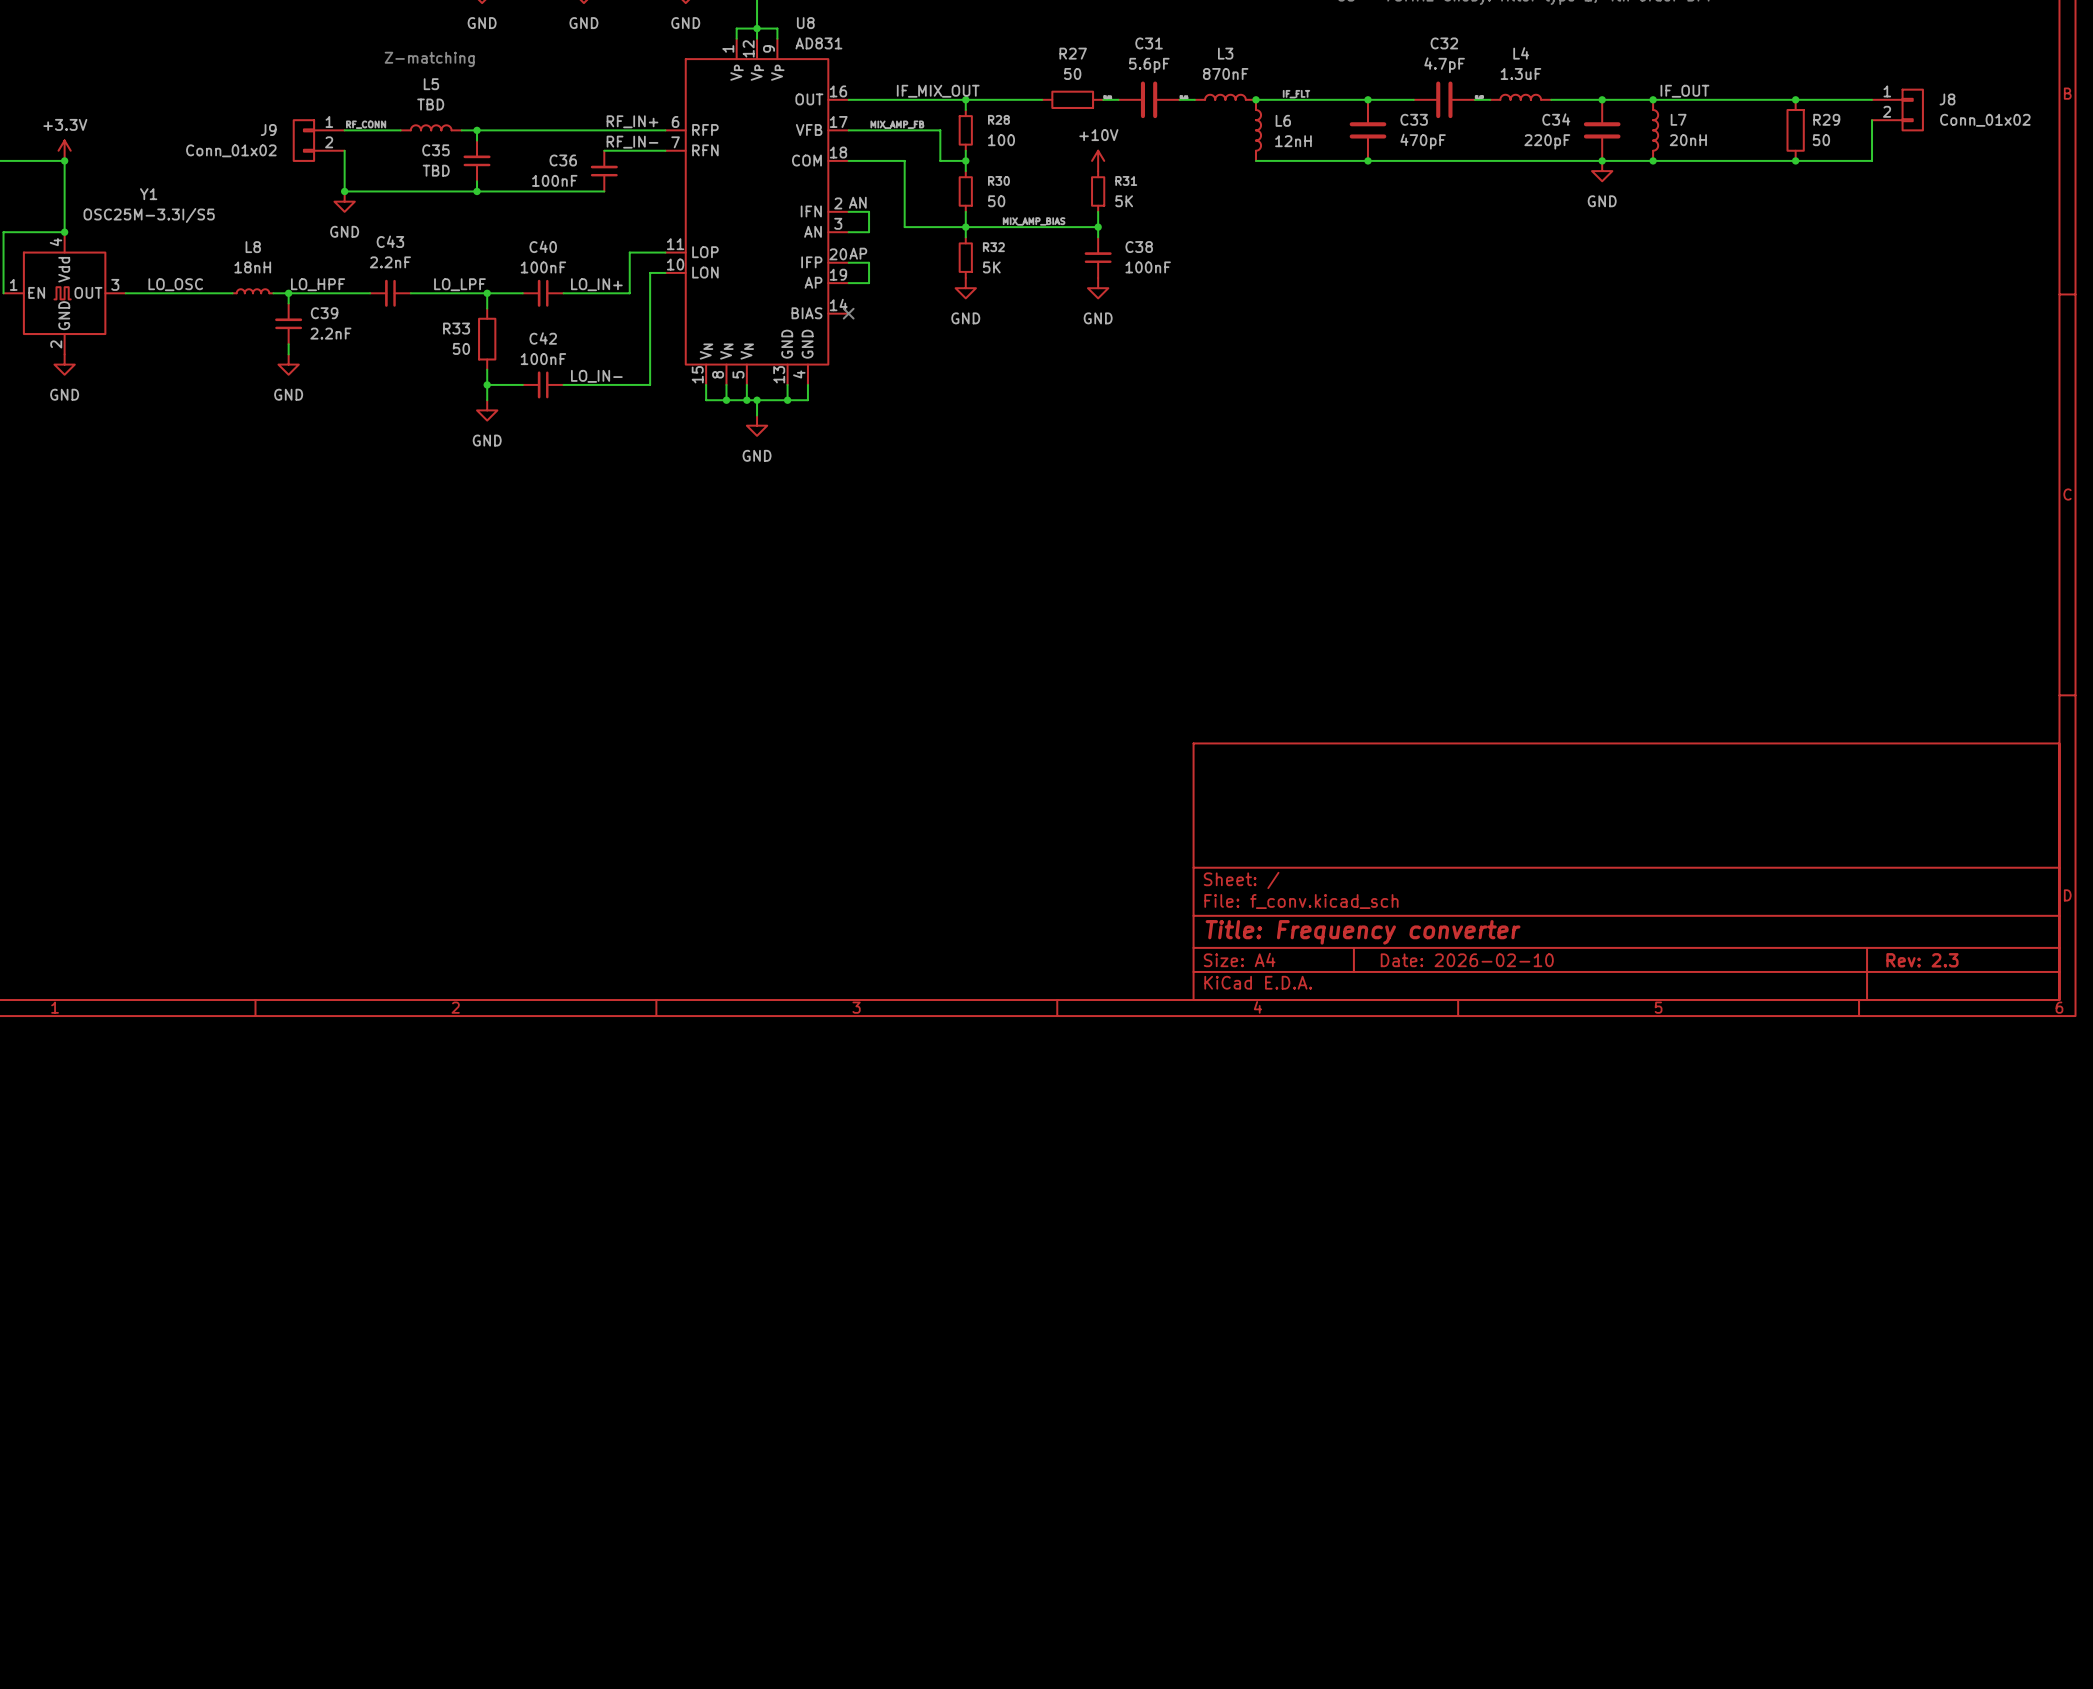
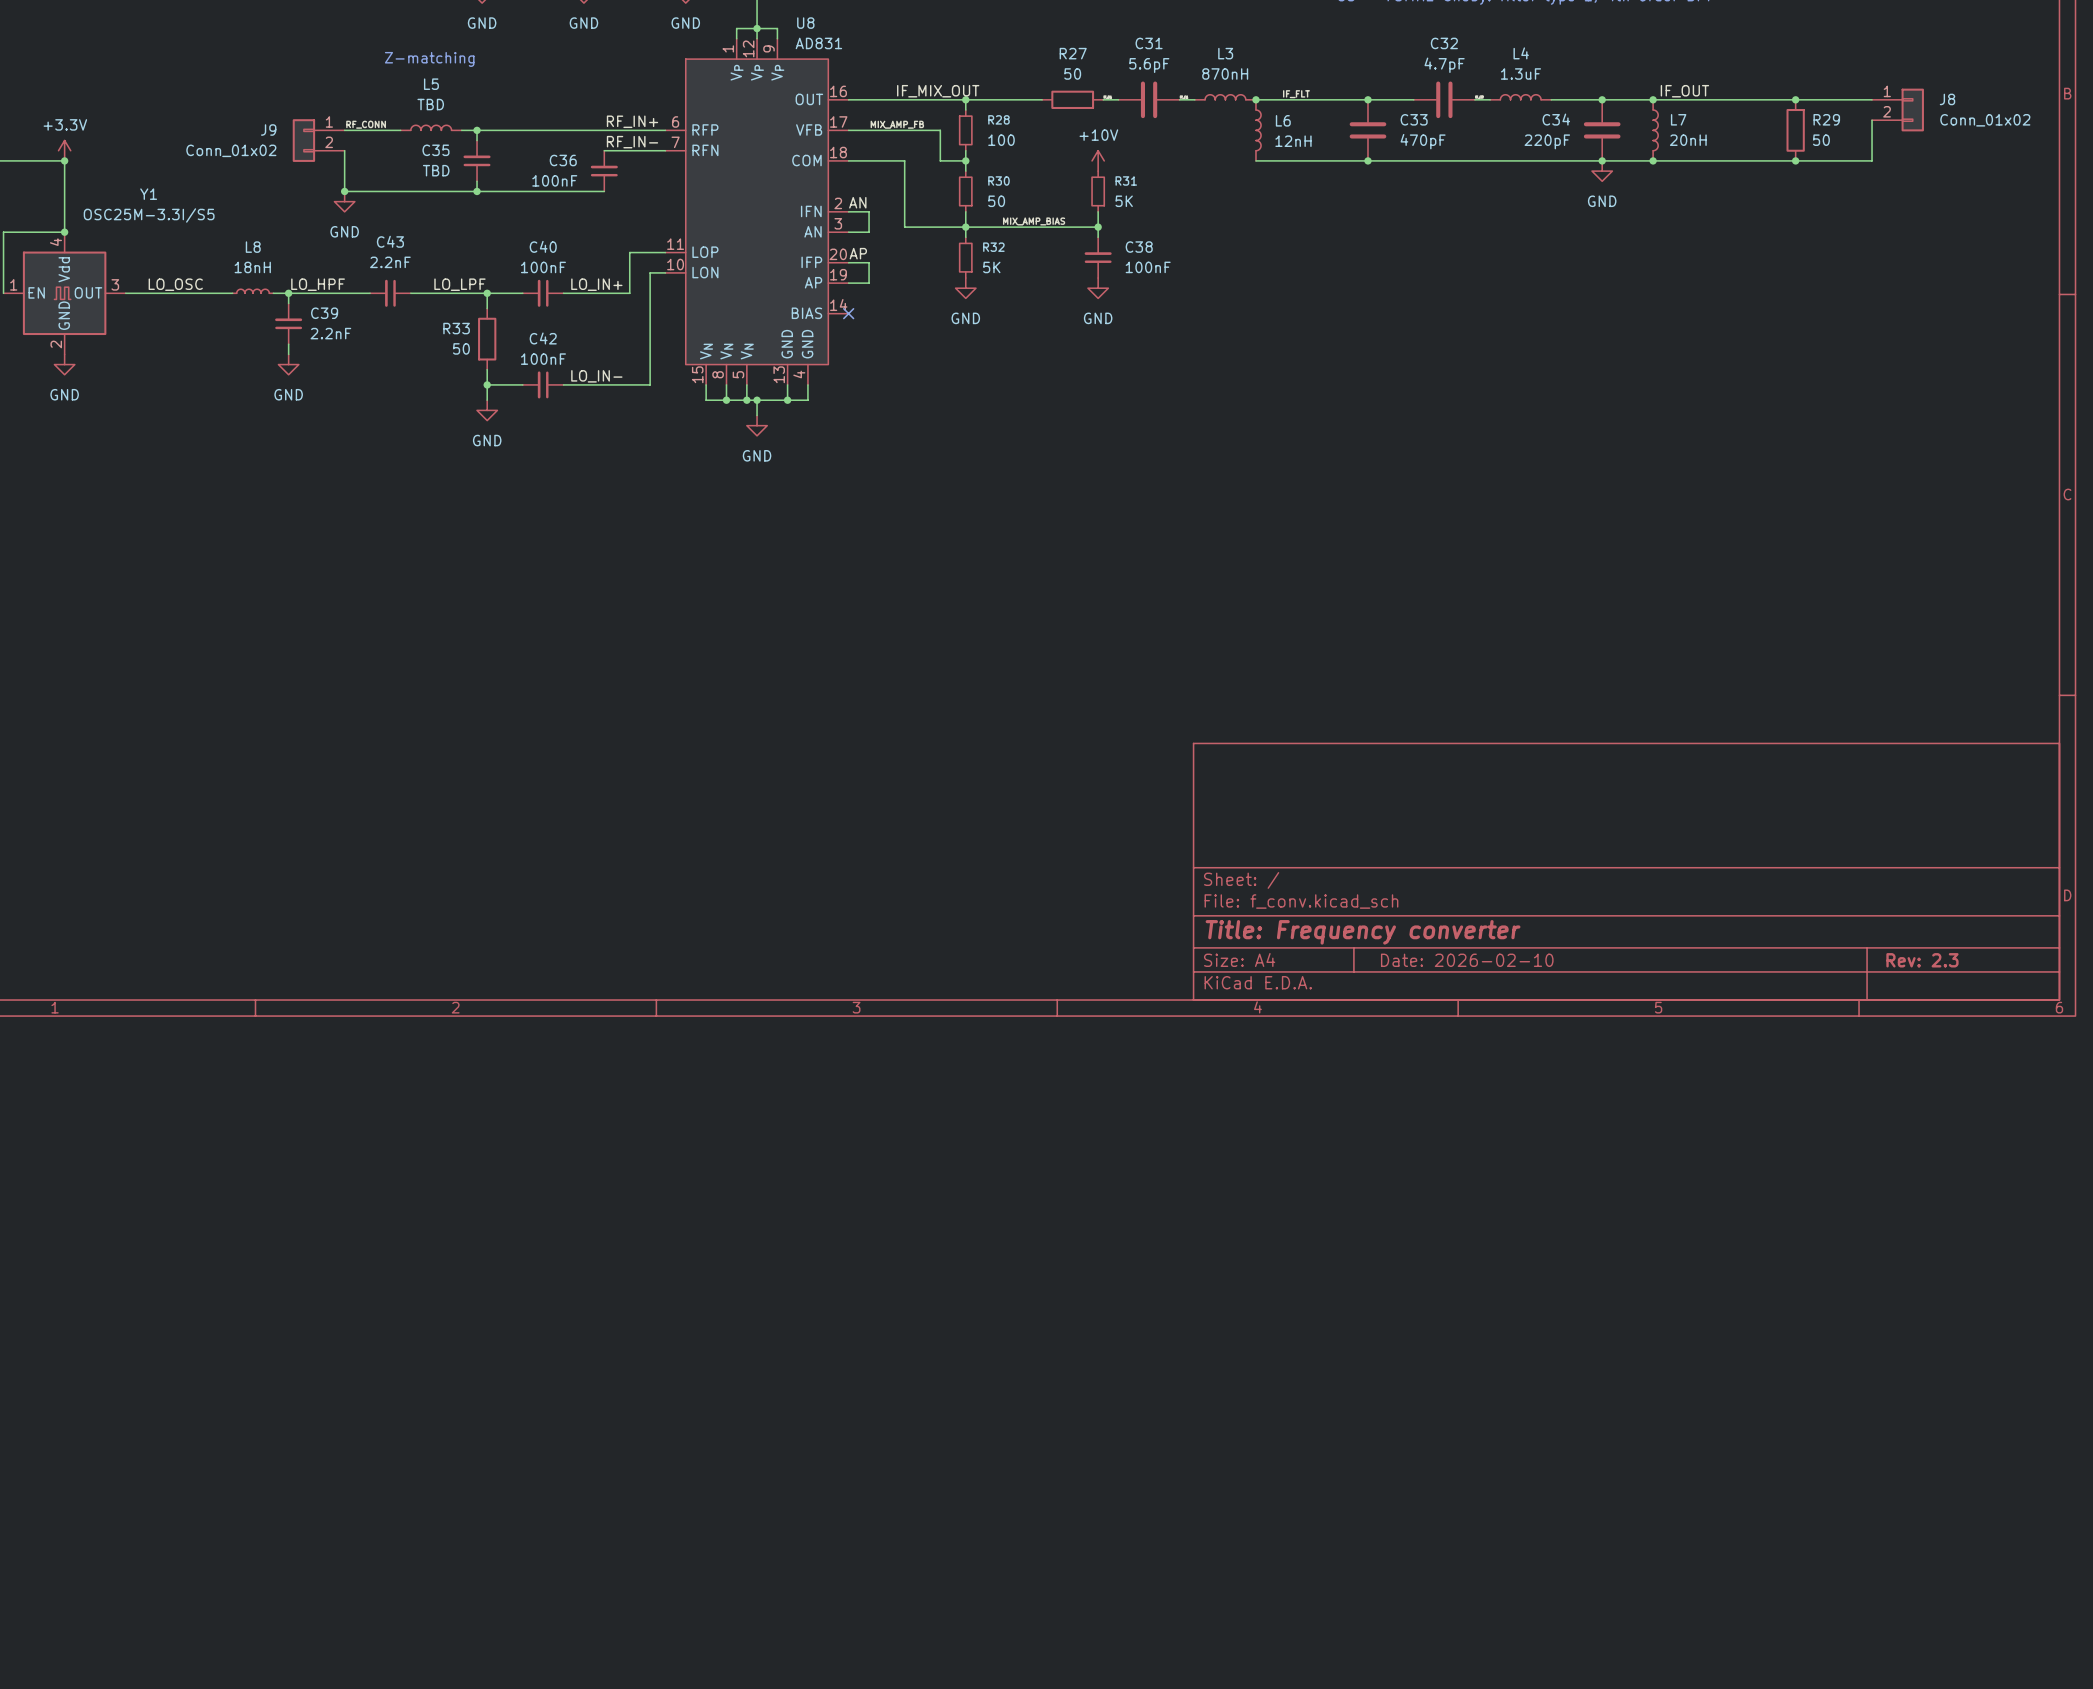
L3 value: 870nF (1225, 73) -> 870nH (1225, 73)

